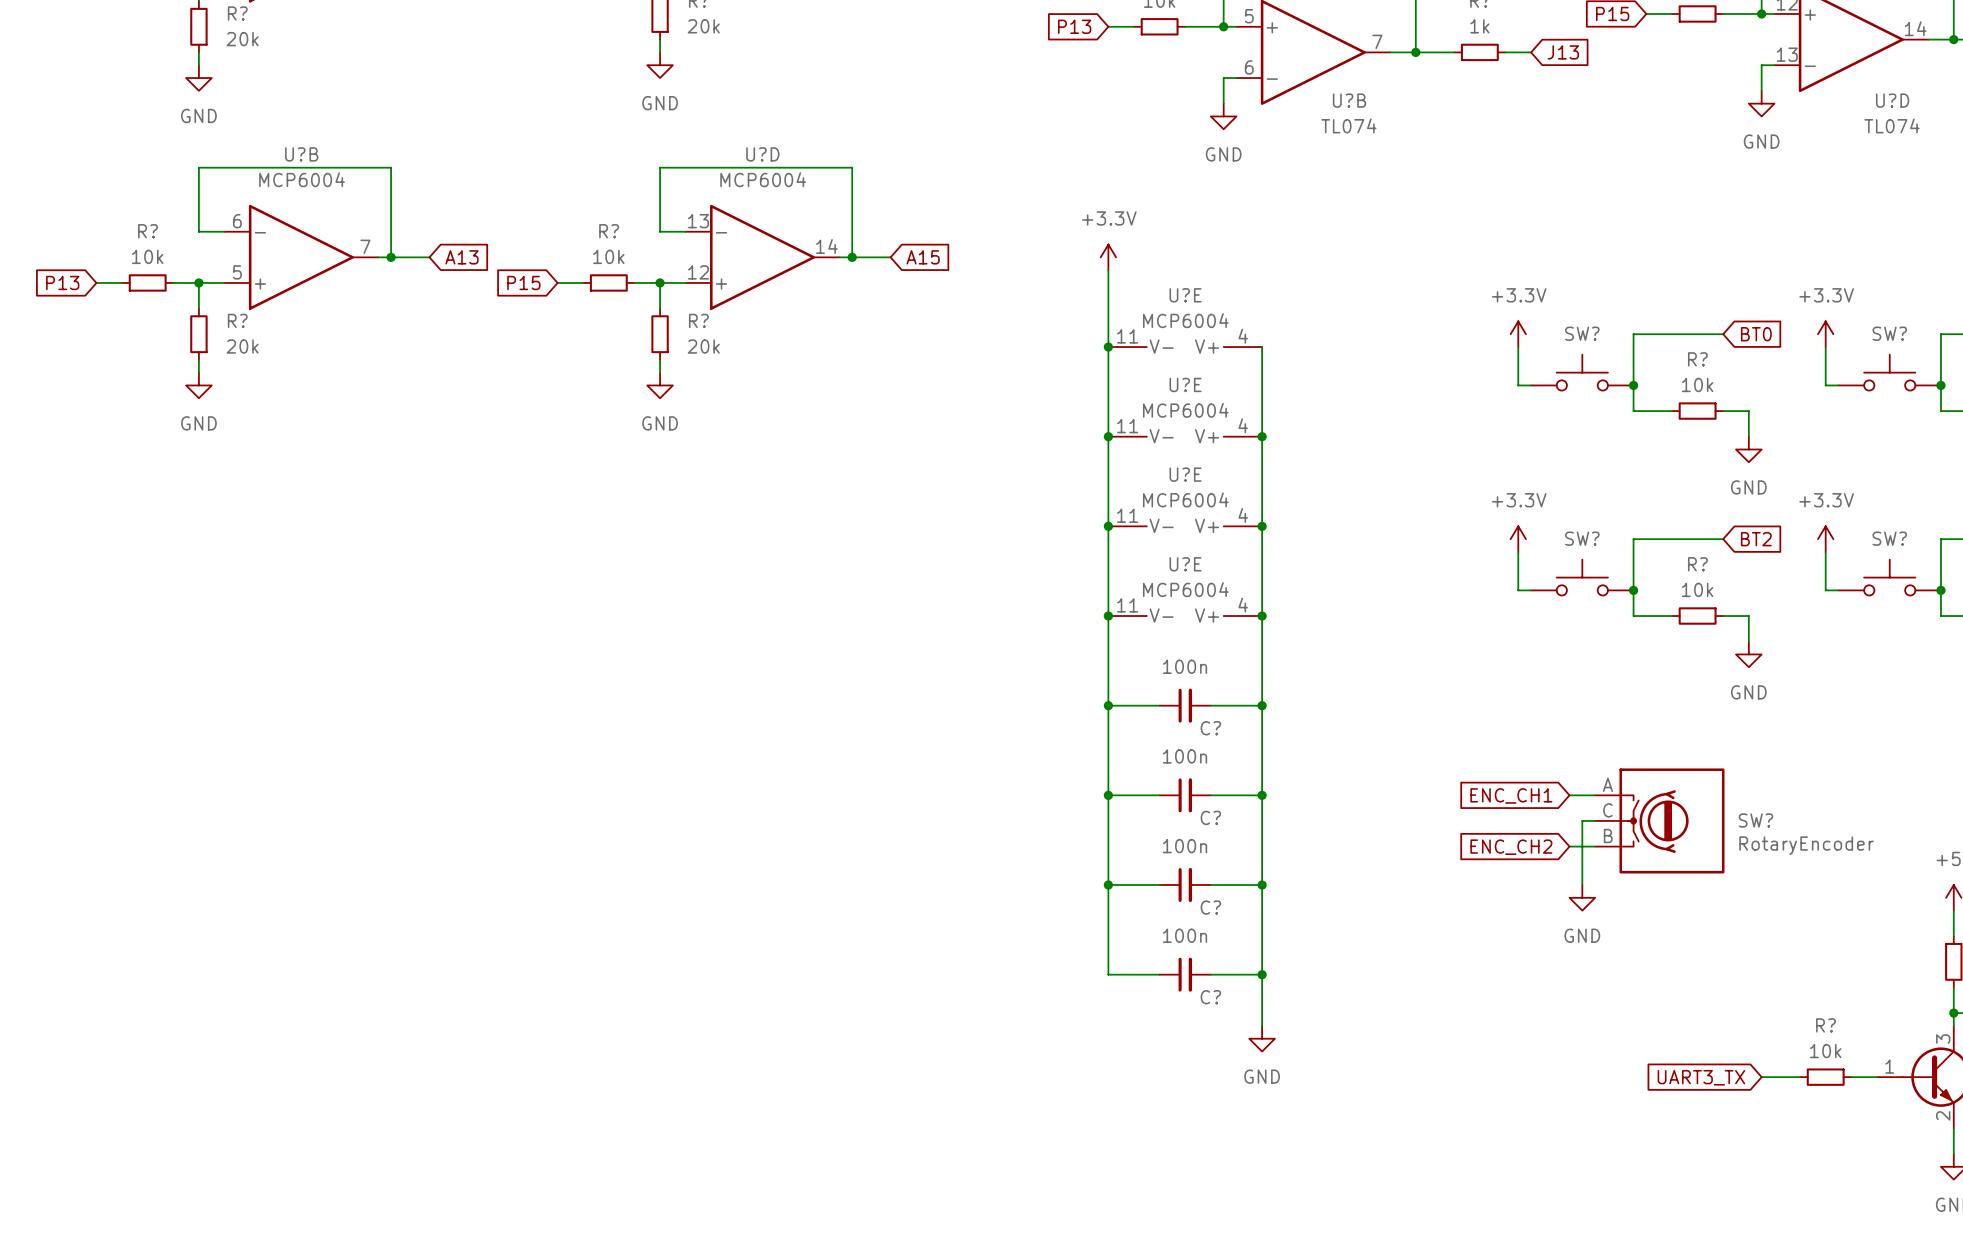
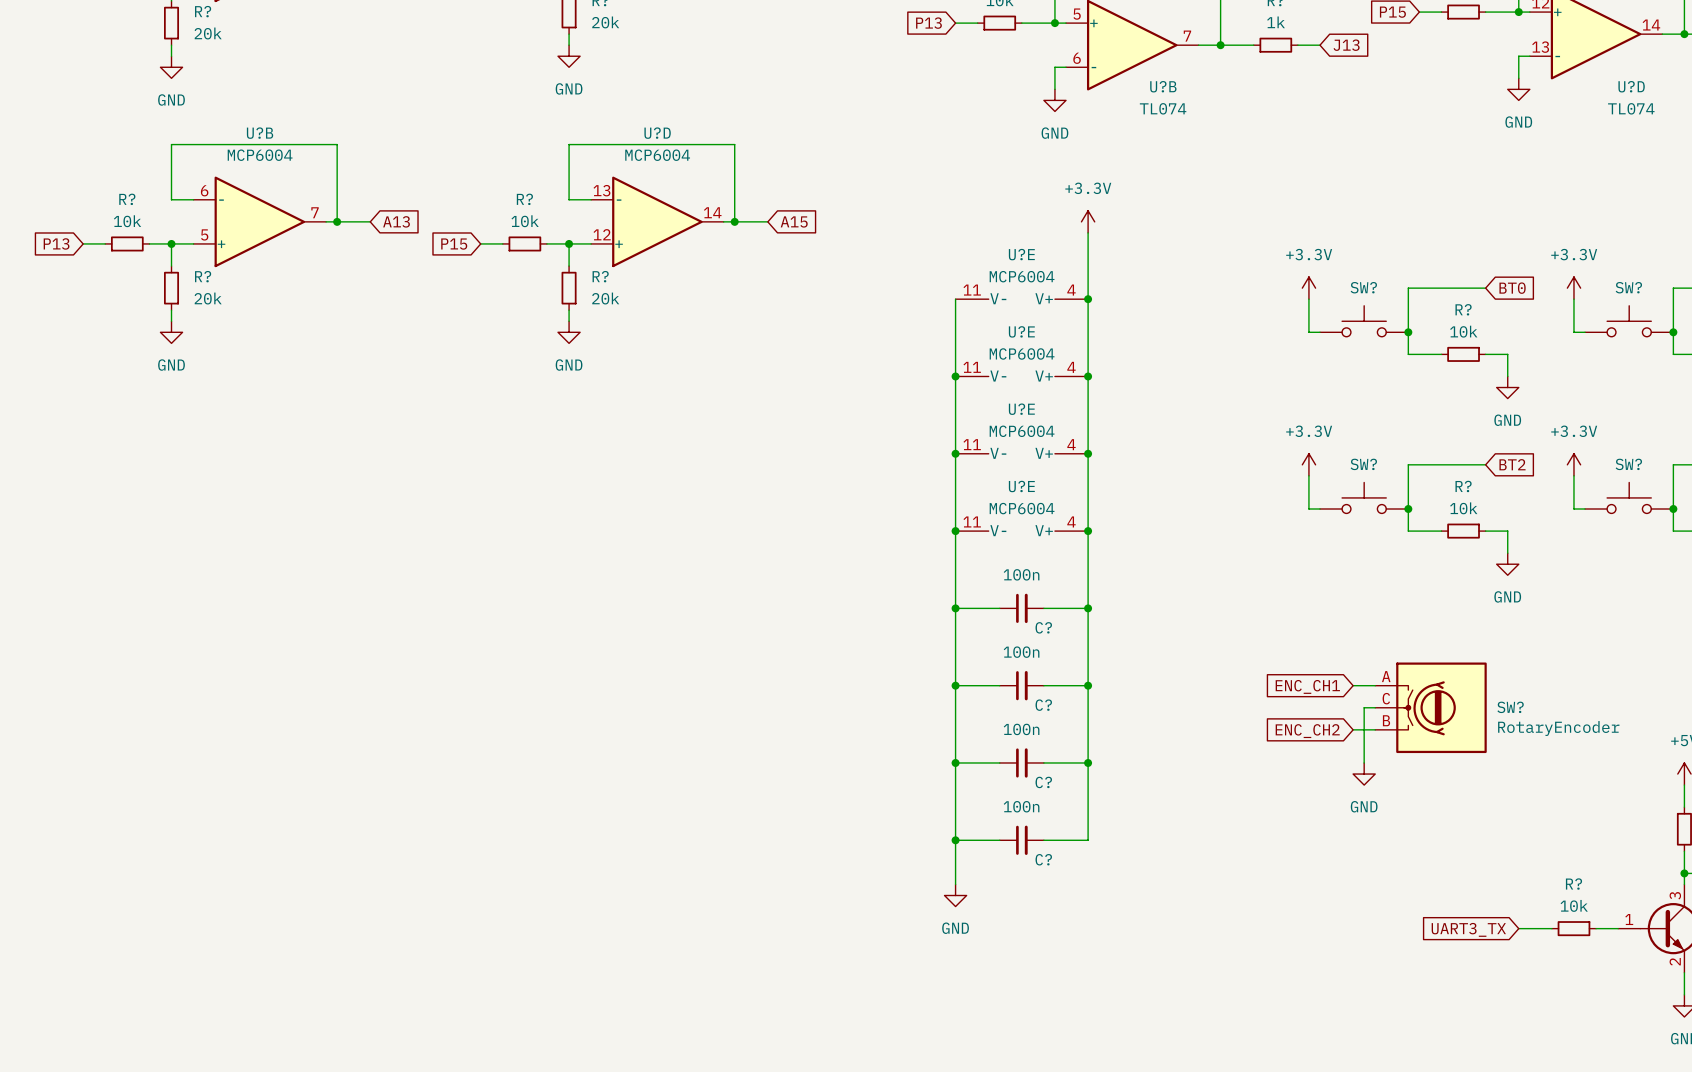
power symbol position: +3.3V (1108, 257) -> +3.3V (1088, 221)
wire: (1108, 270) (1108, 347) -> (1088, 232) (1088, 299)
junction: (1108, 347) -> none
junction: none -> (1088, 299)
junction: none -> (955, 840)
wire: (1262, 974) (1262, 1025) -> (955, 840) (955, 884)
junction: (1262, 974) -> none
power symbol position: GND (1262, 1038) -> GND (955, 895)

